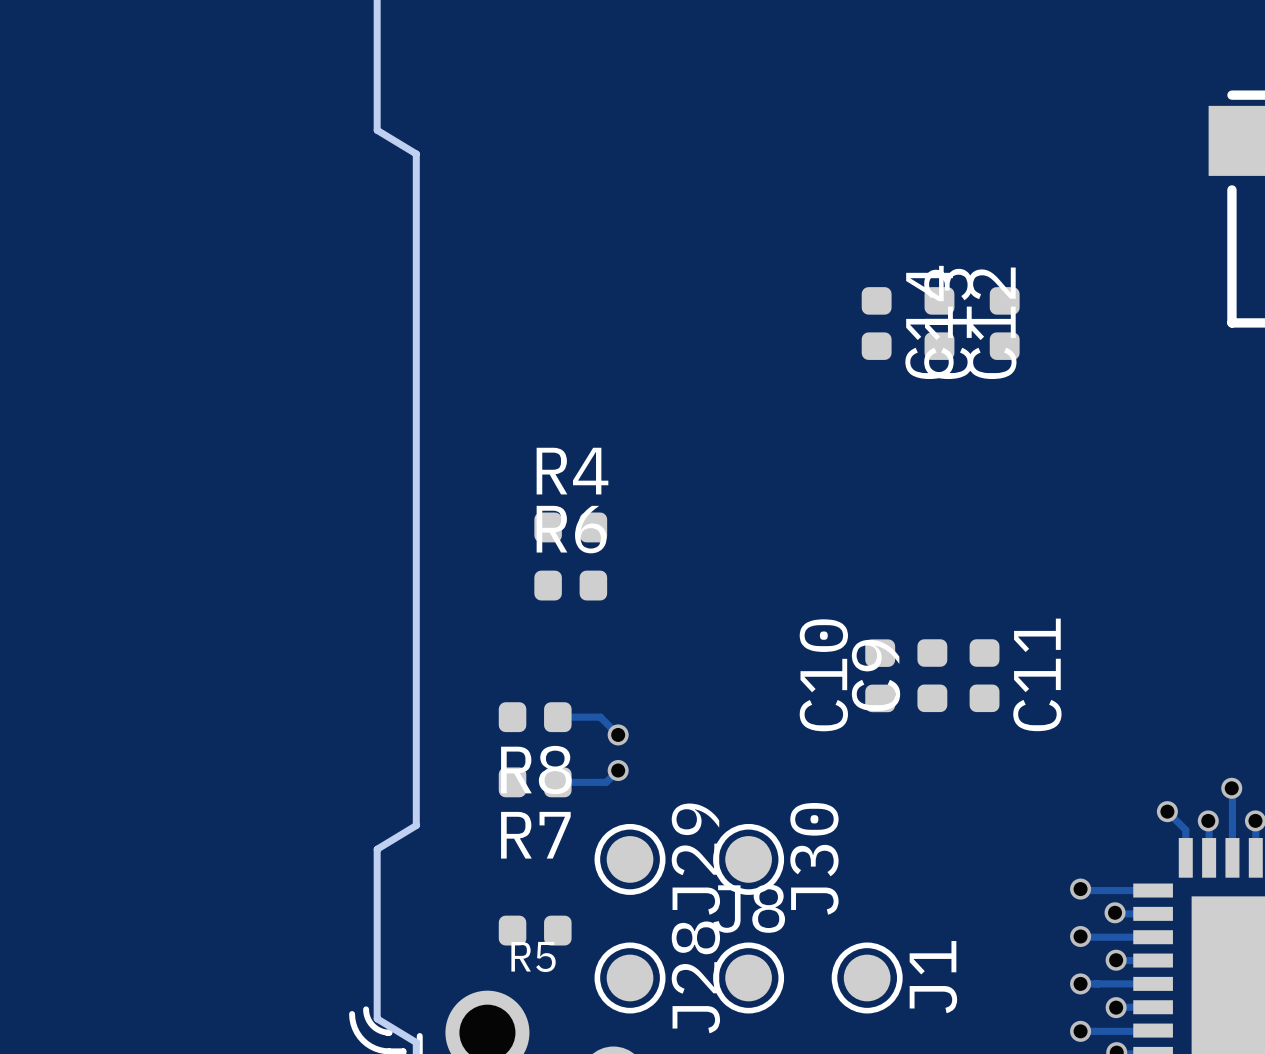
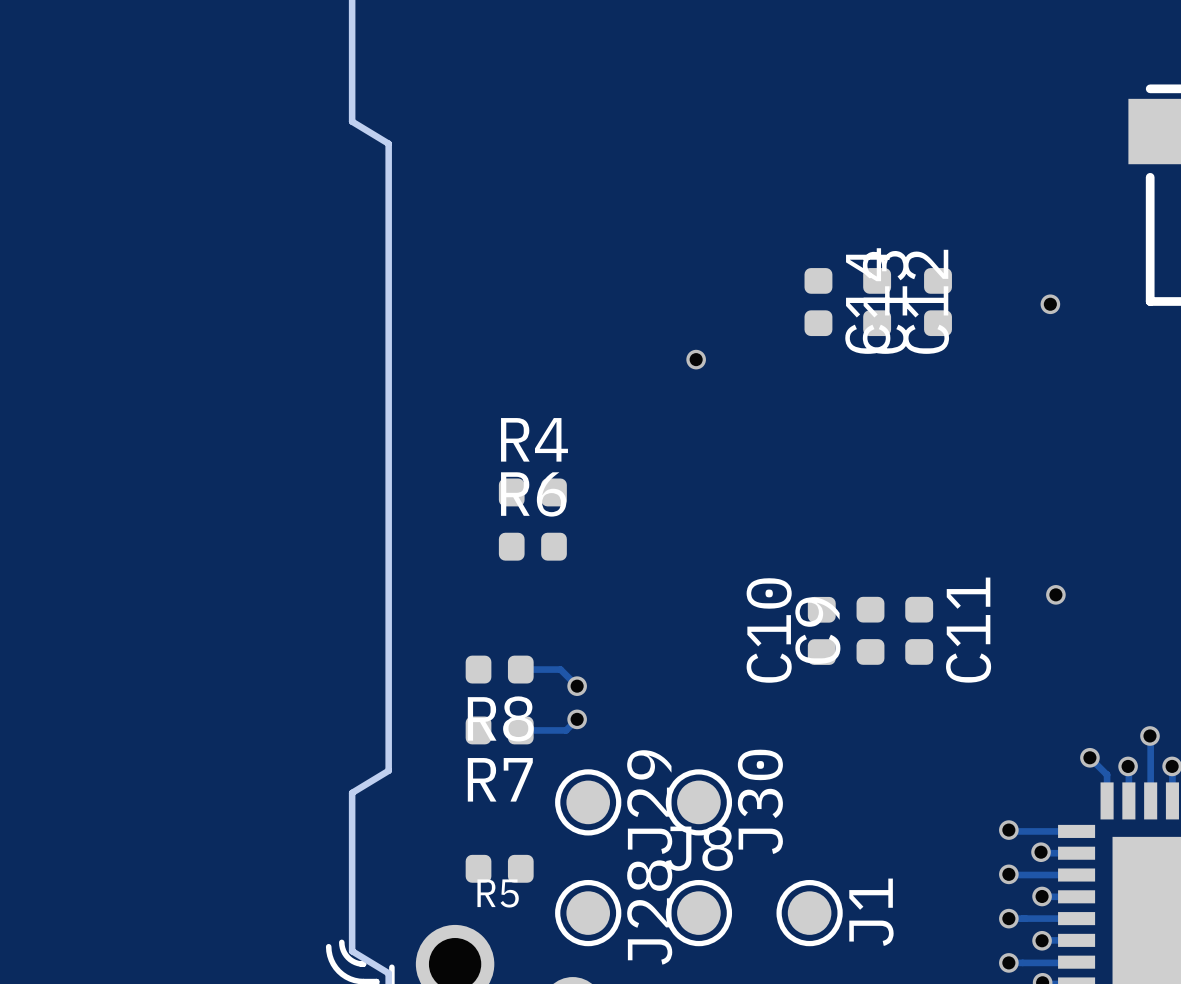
via: none -> (1050, 304)
via: none -> (696, 359)
via: none -> (1055, 594)

